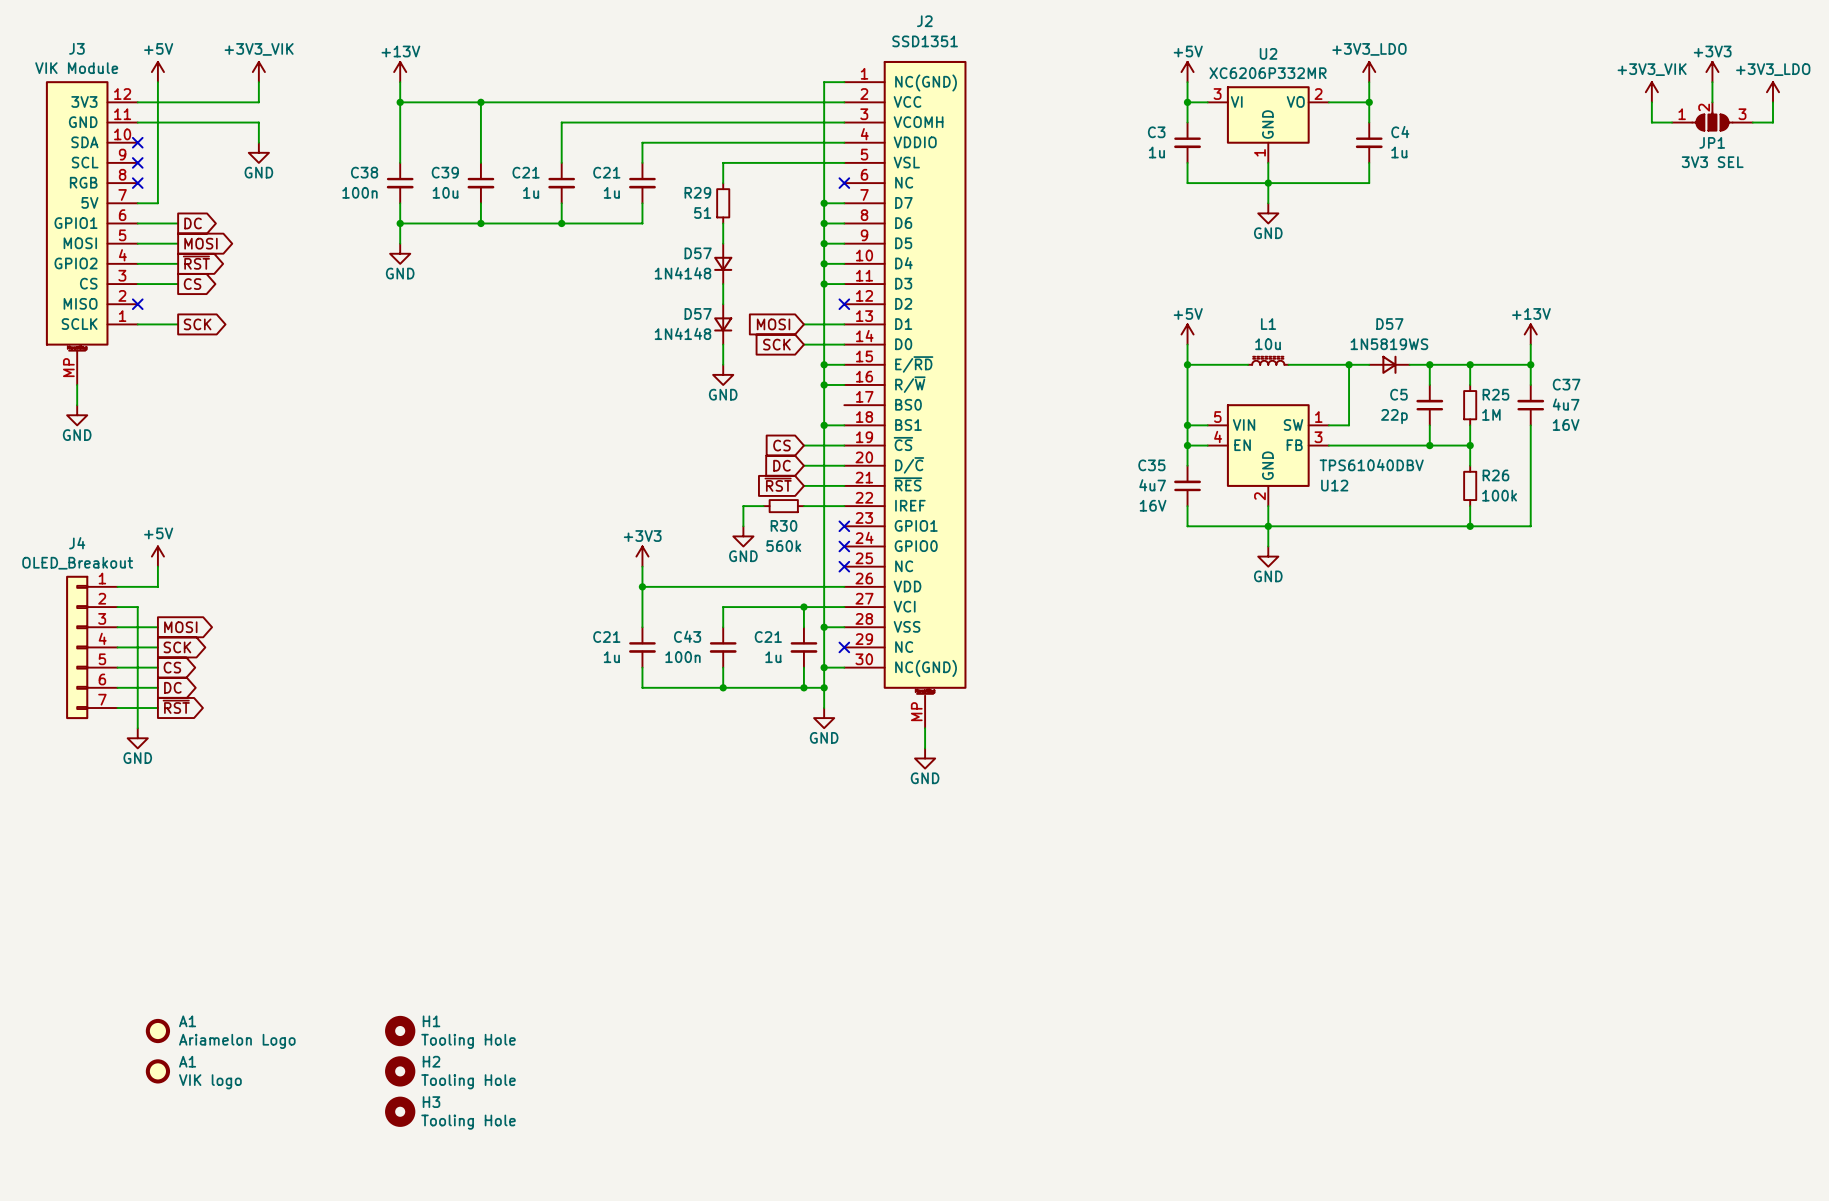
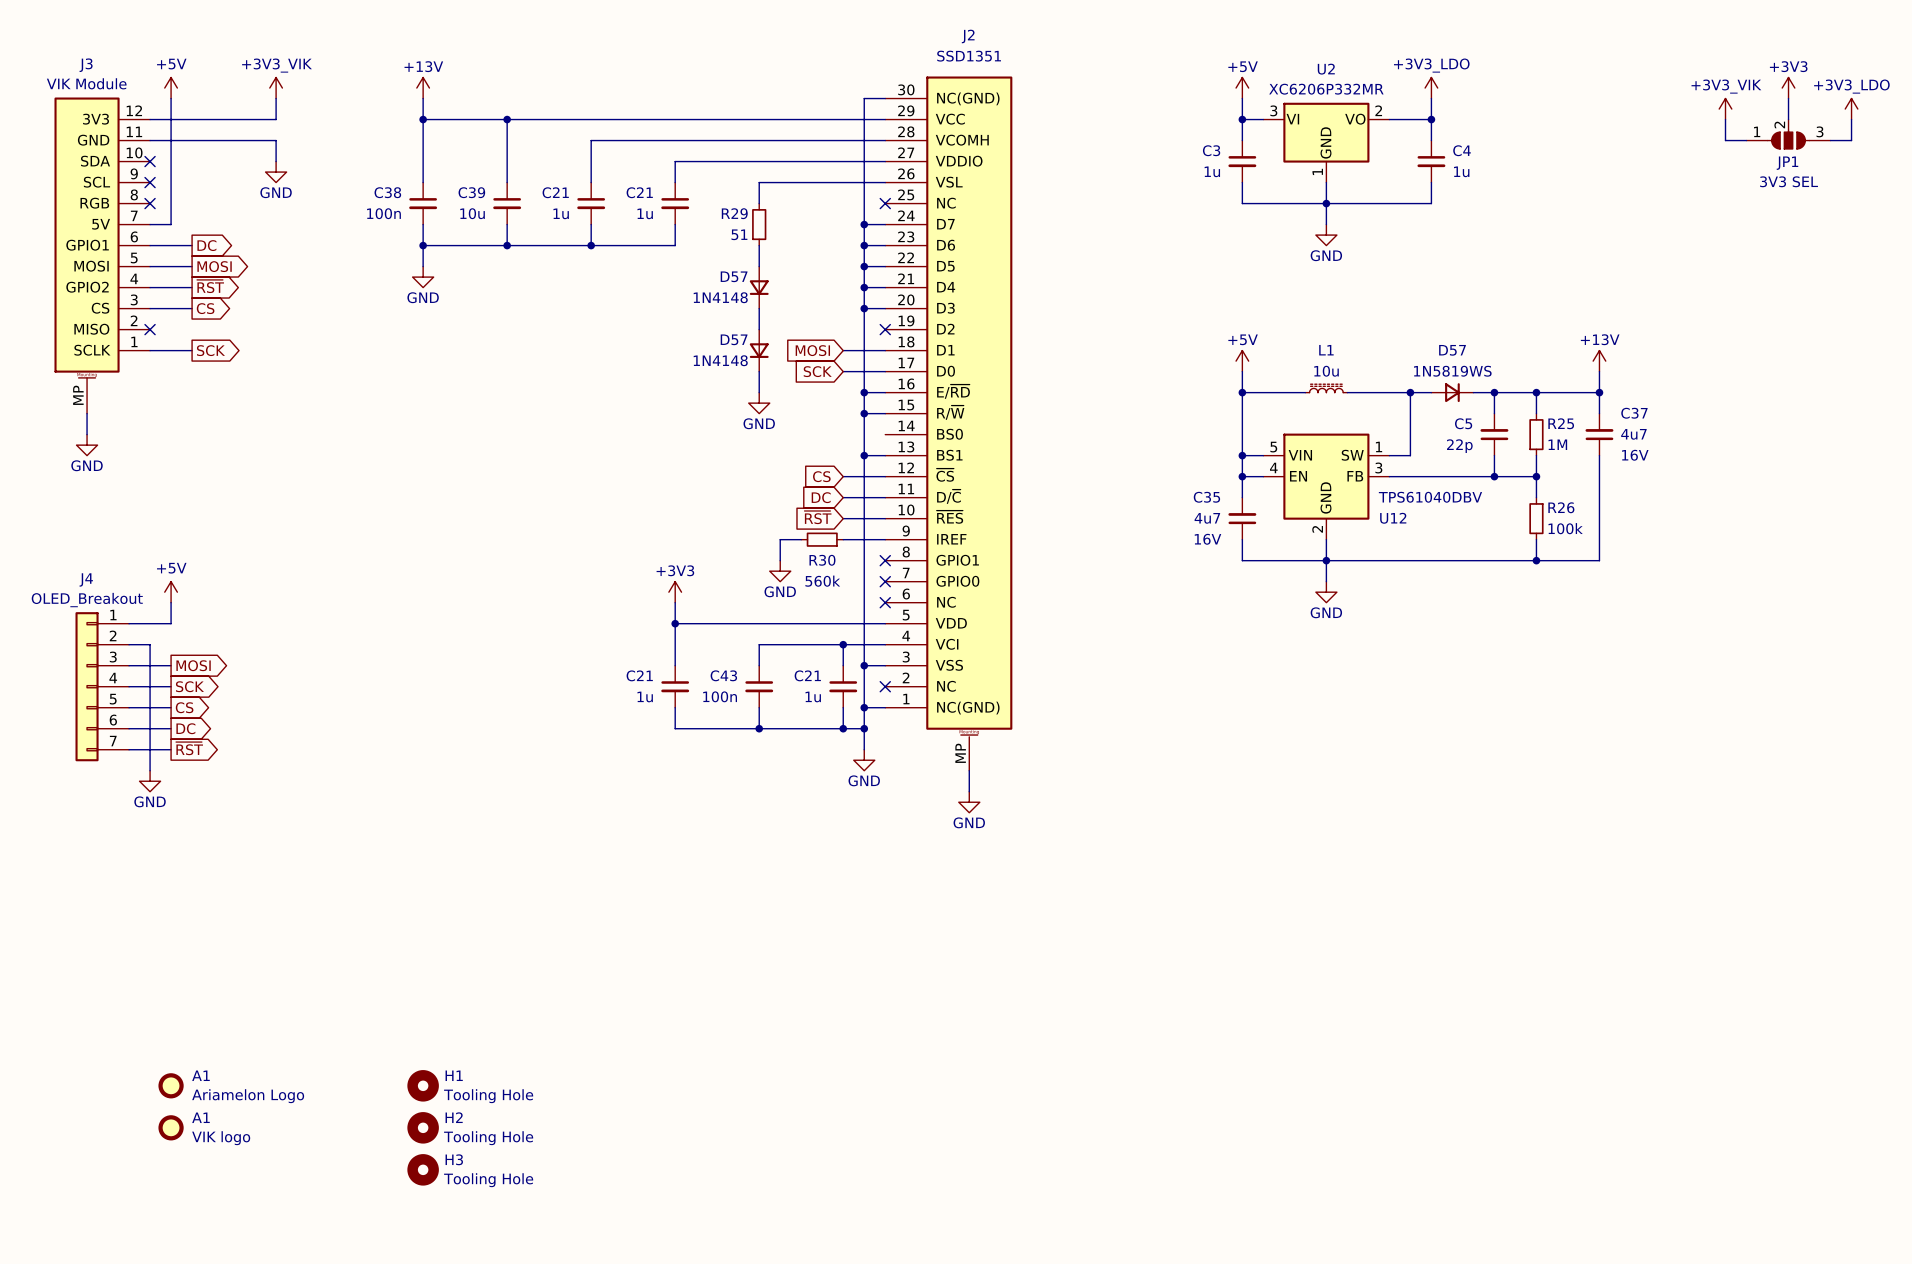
J2 symbol: [844, 60, 967, 729] -> [885, 76, 1013, 771]

